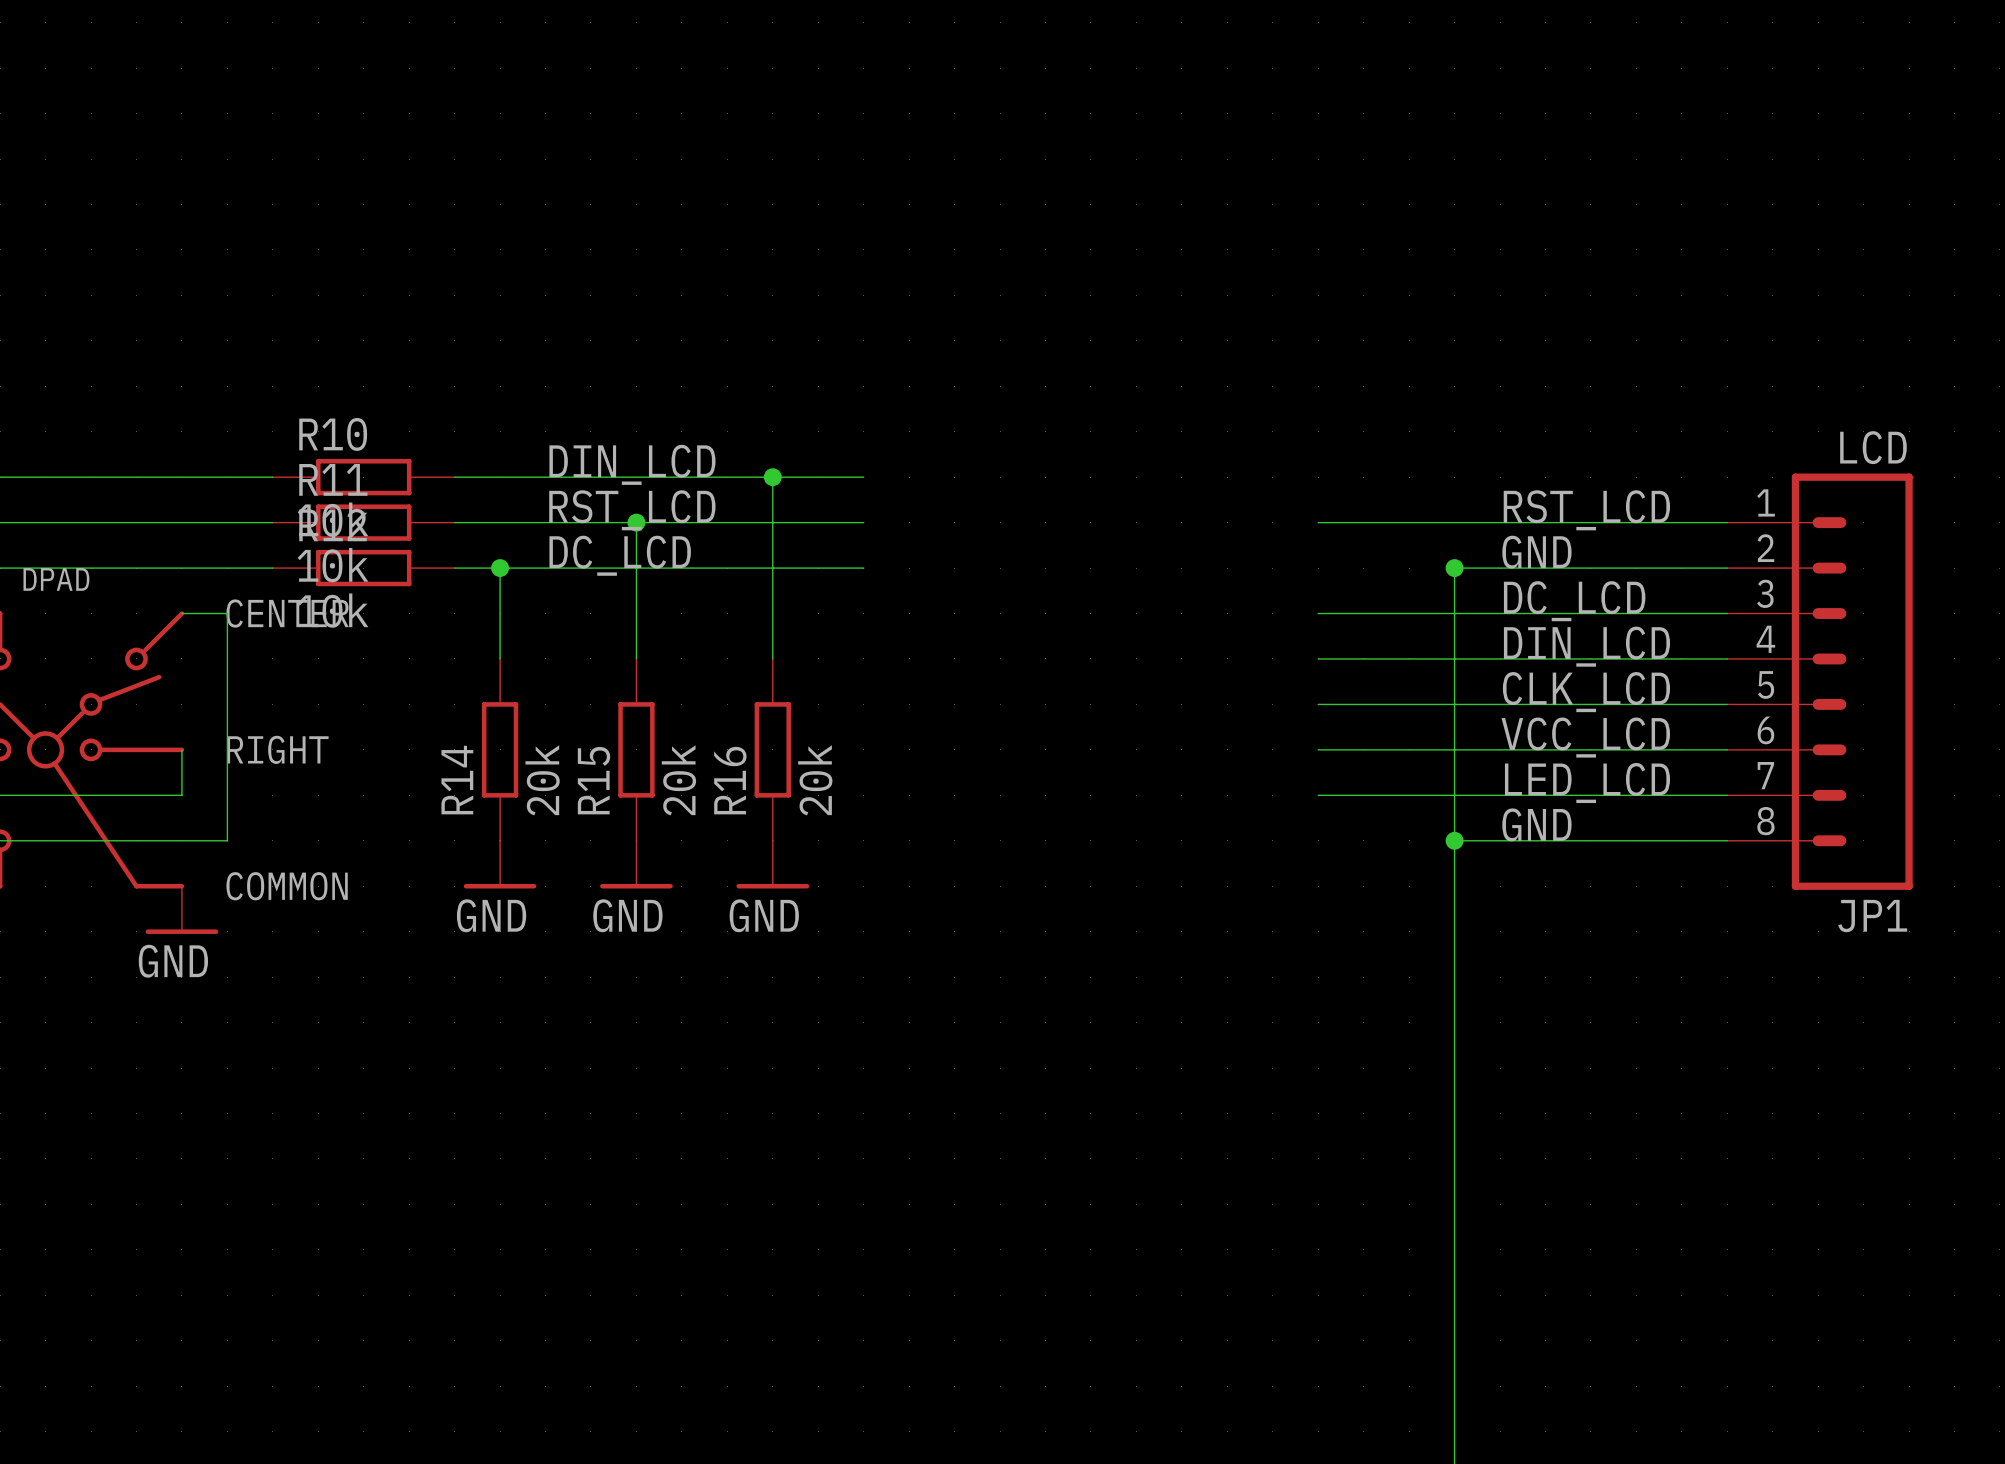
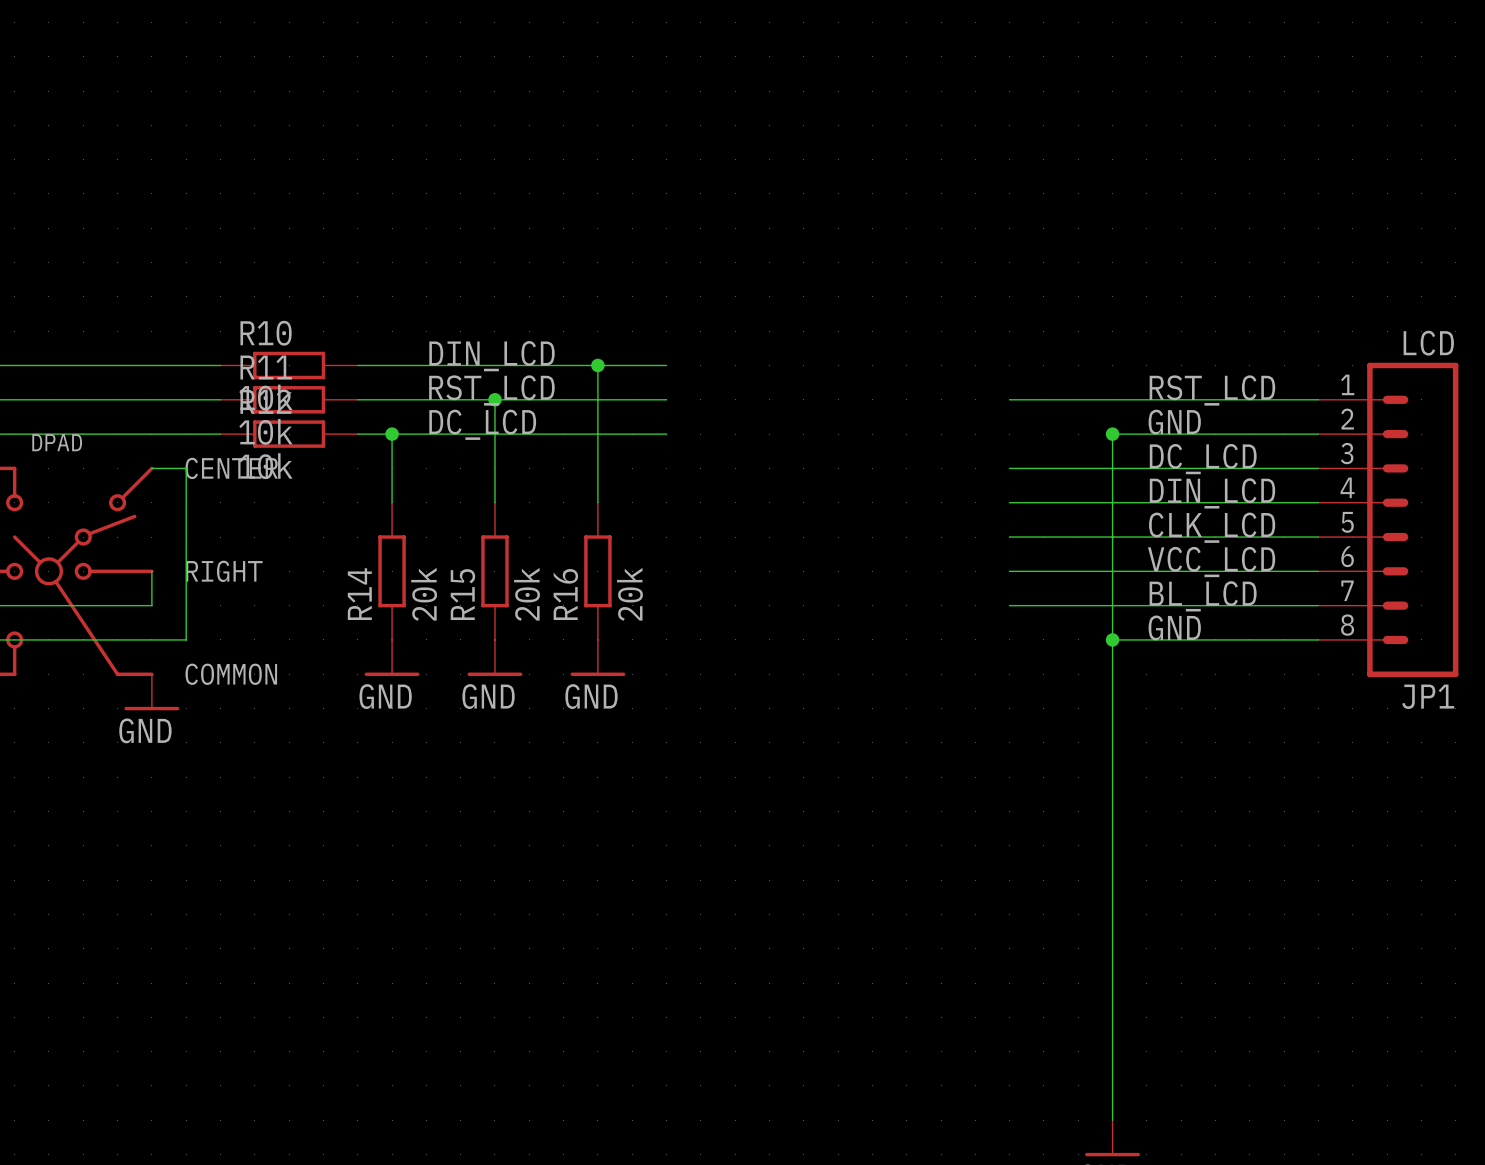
label: LED_LCD (1587, 783) -> BL_LCD (1203, 596)

